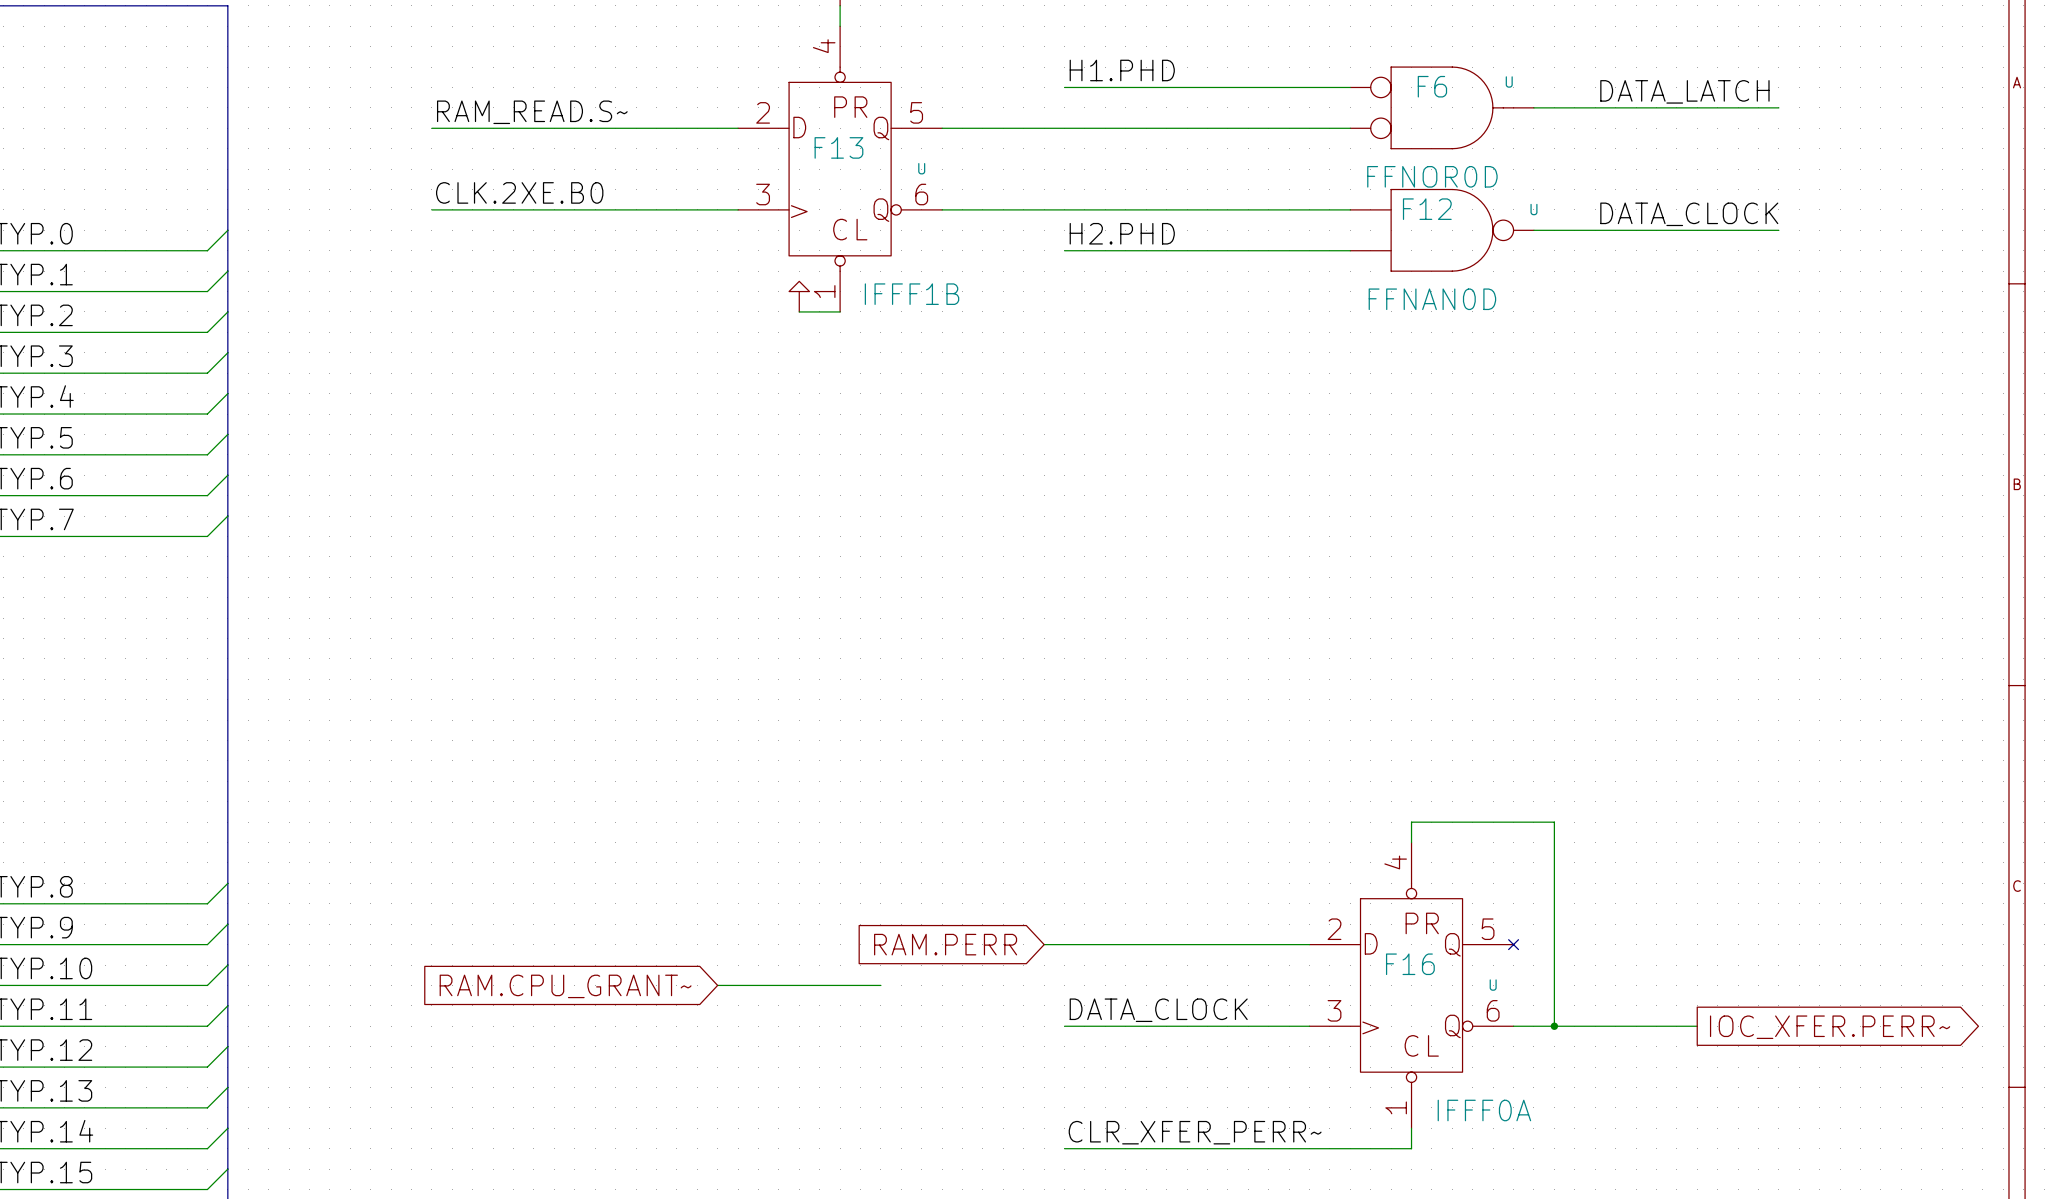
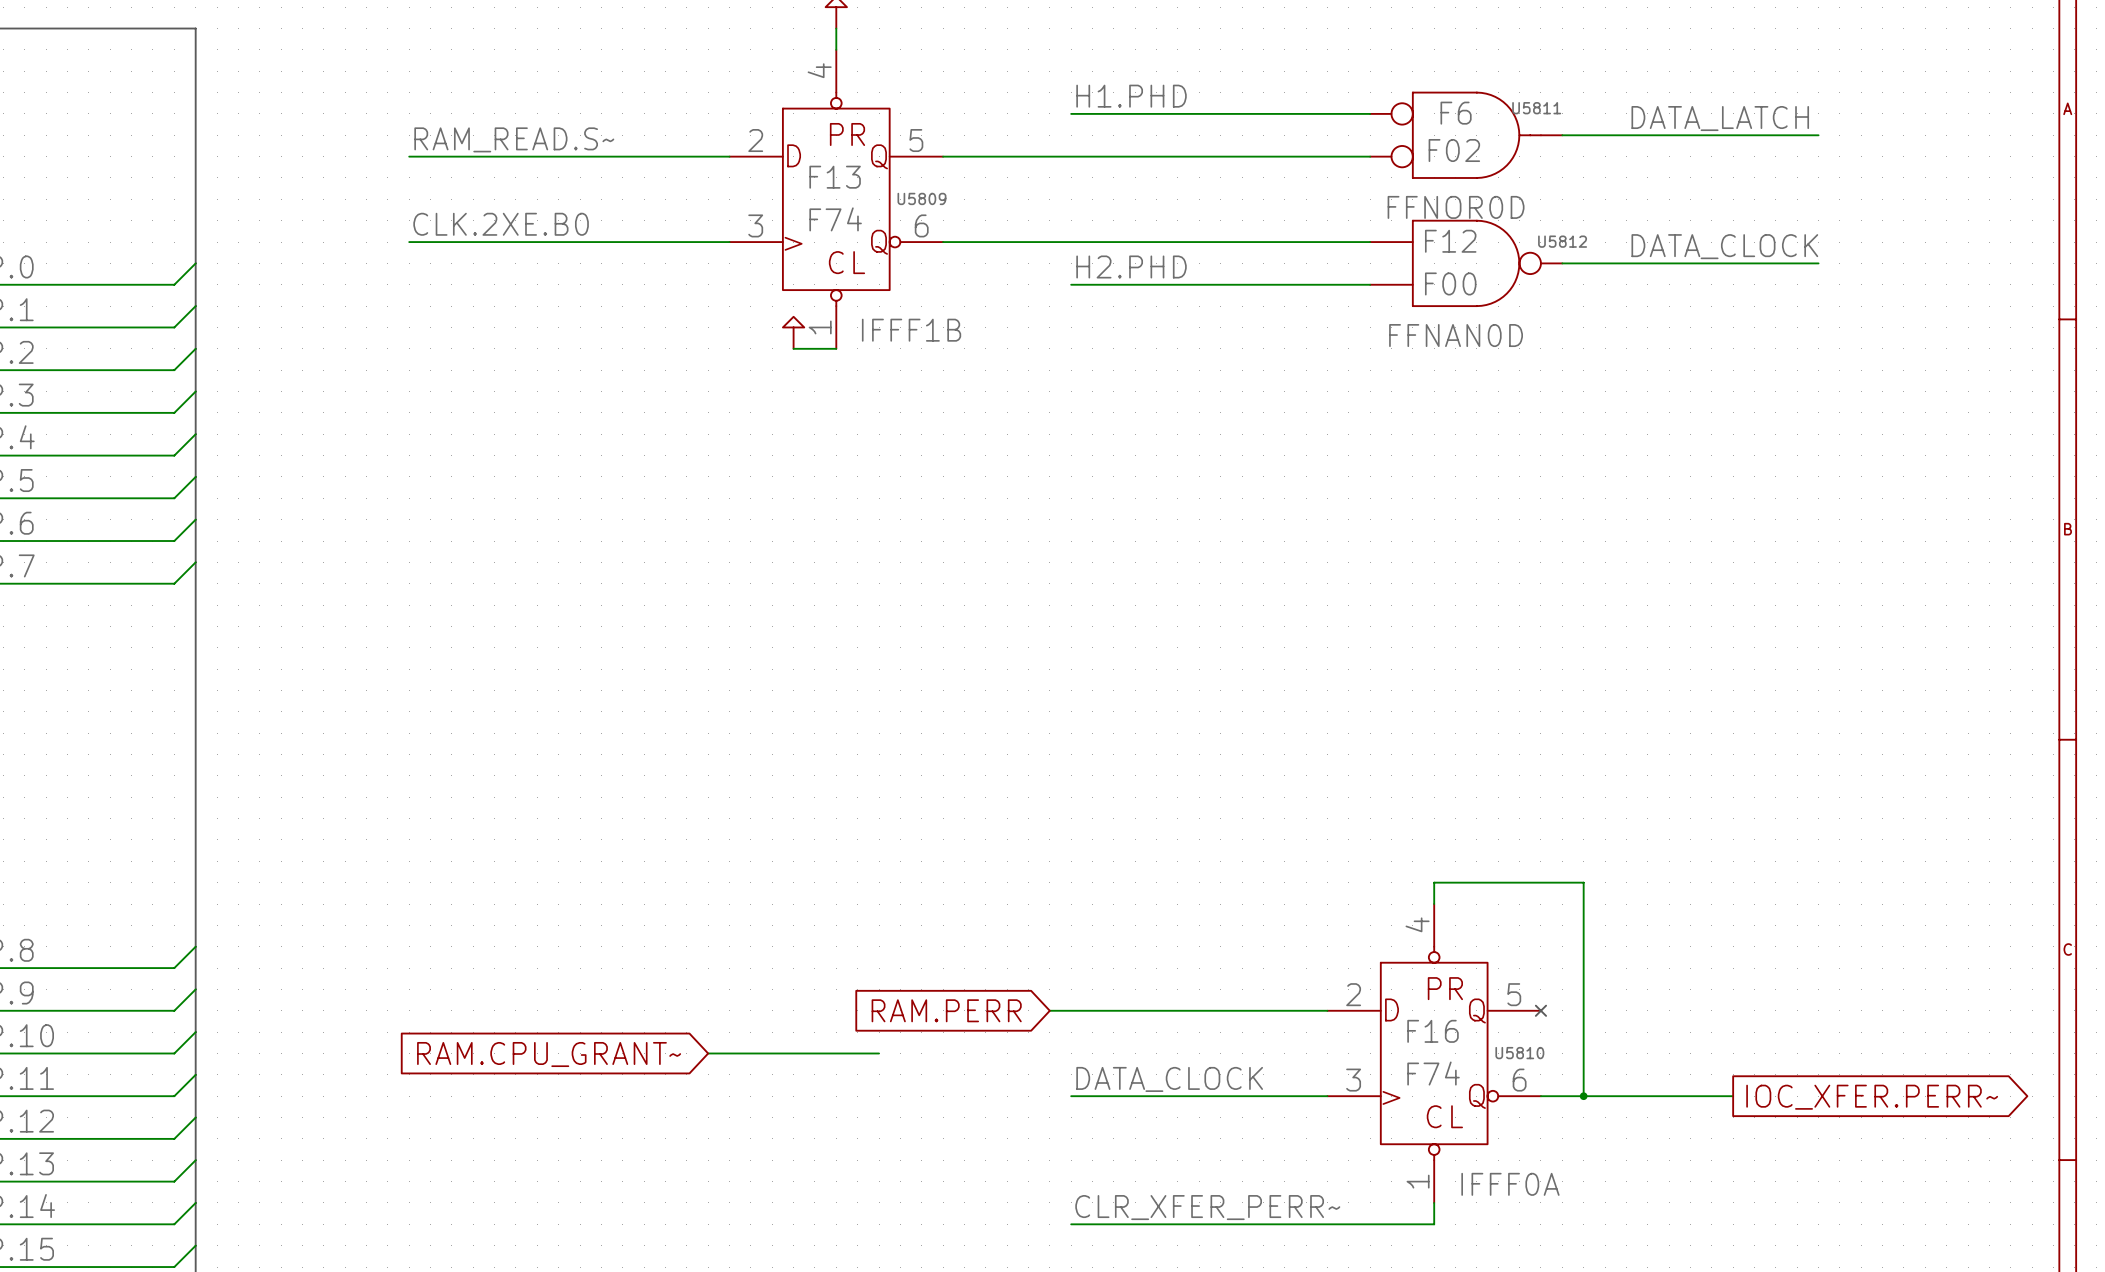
U name: U (1509, 81) -> U5811 (1536, 108)
U value: none -> F02 (1454, 150)
U name: U (921, 168) -> U5809 (921, 198)
U value: none -> F74 (835, 219)
U name: U (1533, 209) -> U5812 (1562, 241)
U value: none -> F00 (1450, 283)
U name: U (1493, 985) -> U5810 (1519, 1053)
U value: none -> F74 (1433, 1073)

